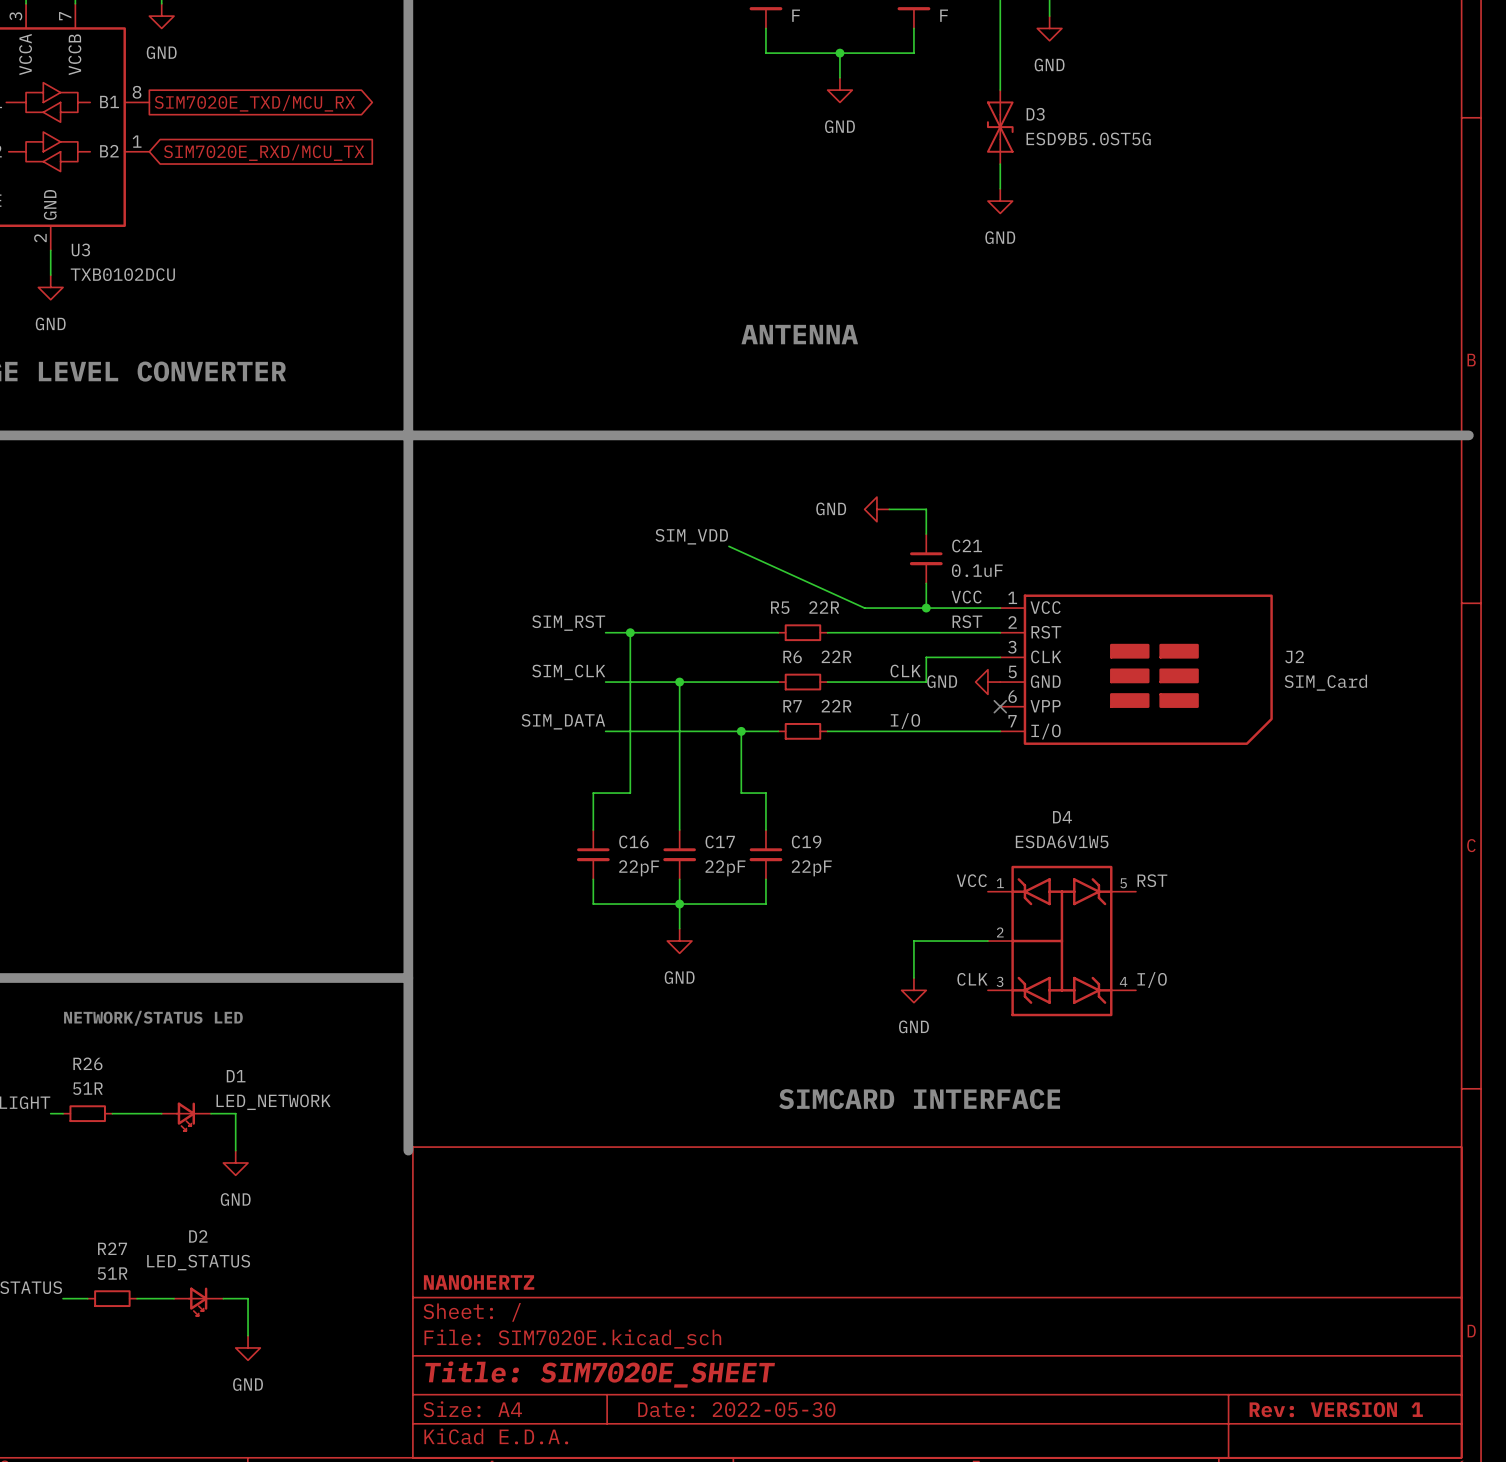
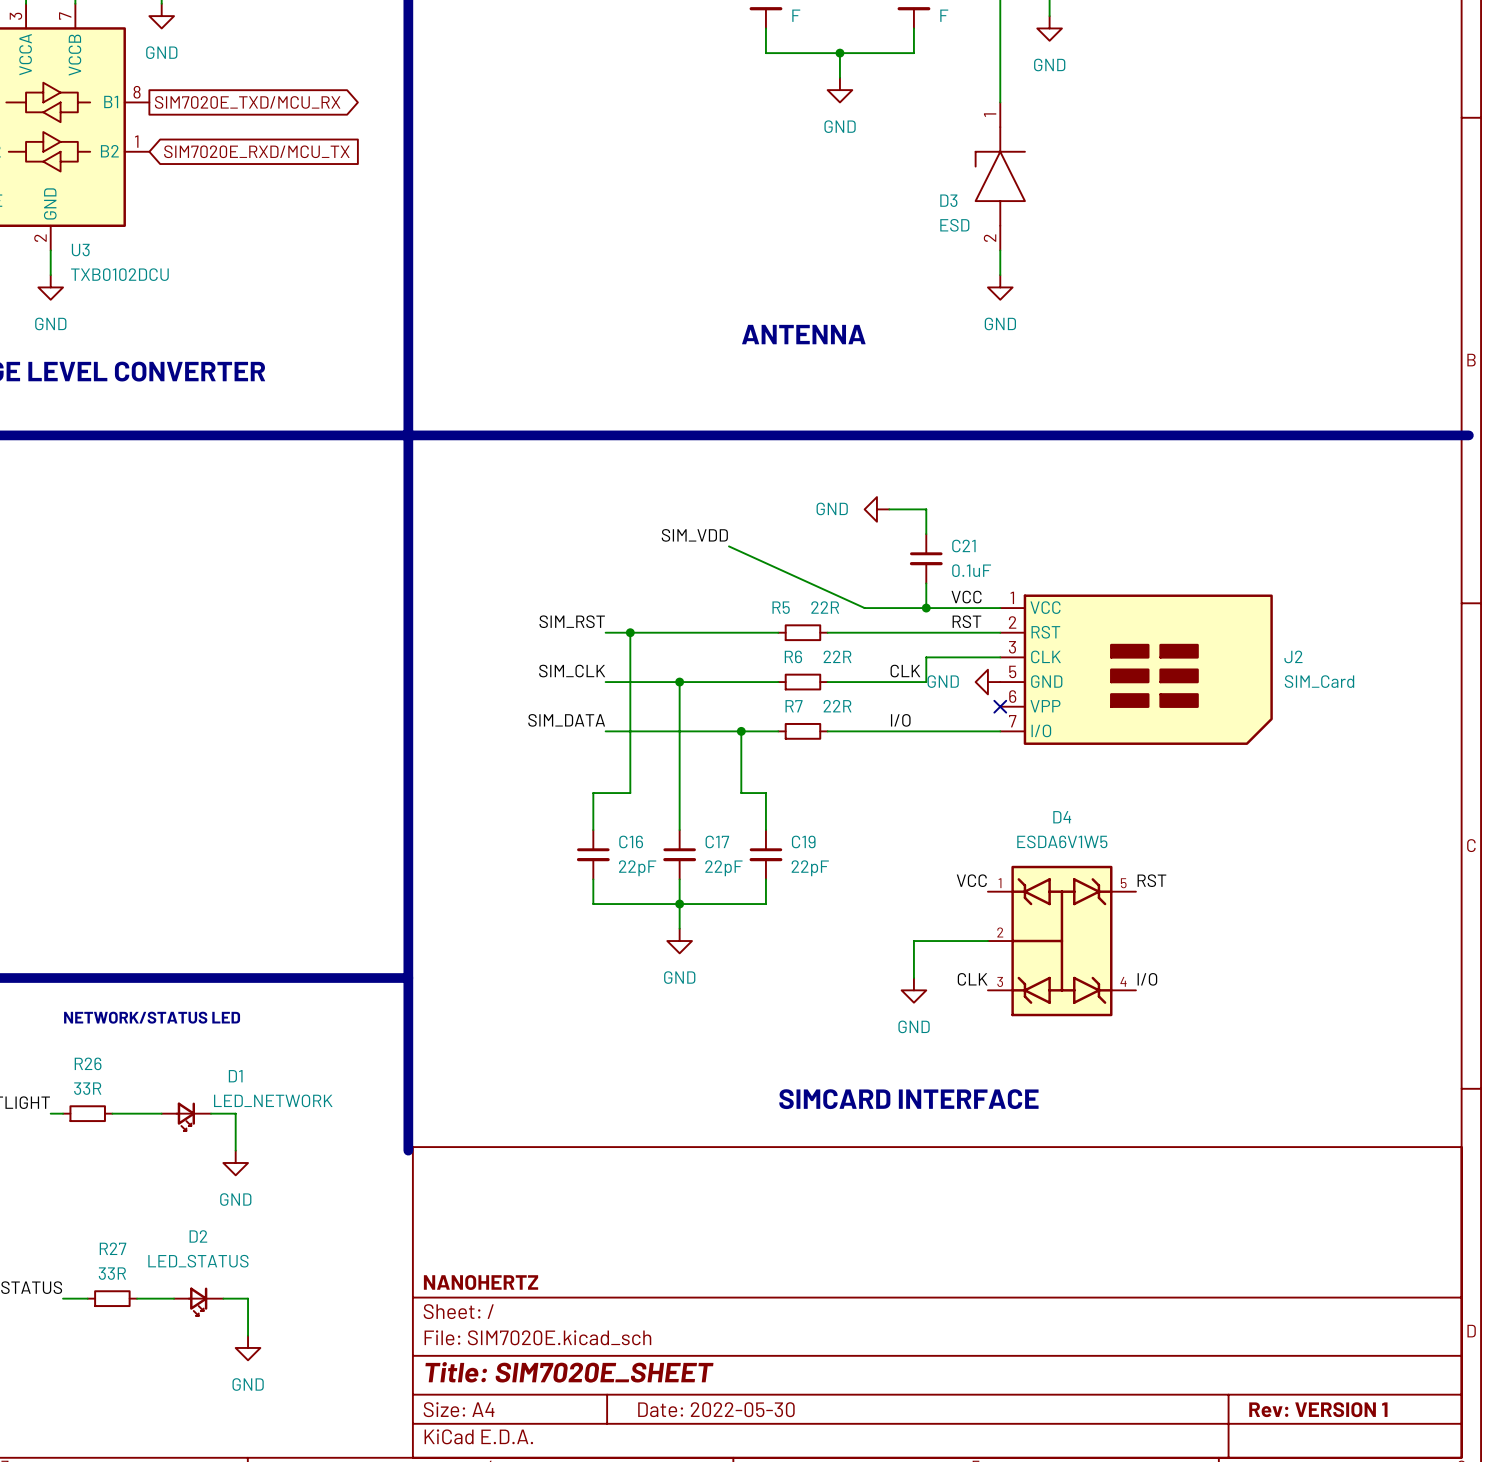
D3 symbol: [986, 90, 1014, 165] -> [974, 102, 1026, 251]
D3 name position: D3 (1035, 114) -> D3 (948, 200)
D3 value: ESD9B5.0ST5G (1088, 138) -> ESD (954, 225)
wire: (1000, 164) (1000, 188) -> (1000, 250) (1000, 275)
power symbol position: GND (1000, 201) -> GND (1000, 287)
R26 value: 51R (87, 1088) -> 33R (87, 1088)
R27 value: 51R (112, 1273) -> 33R (112, 1273)

